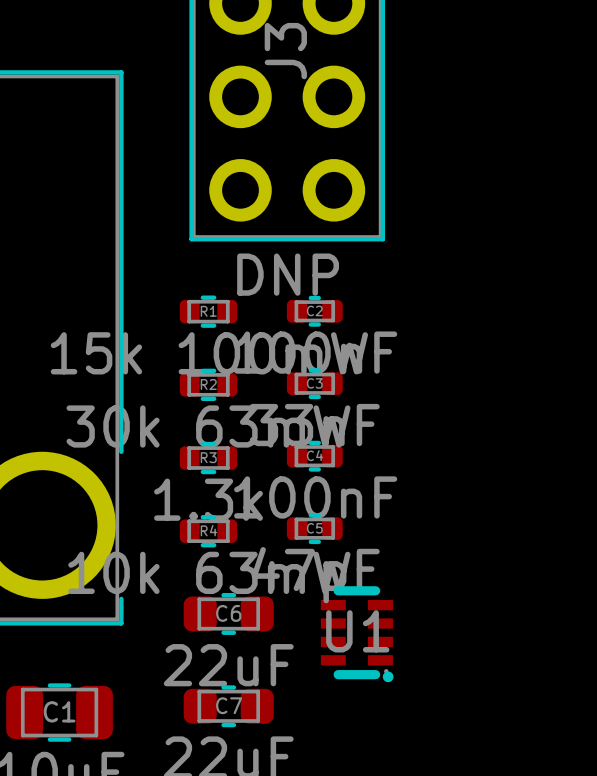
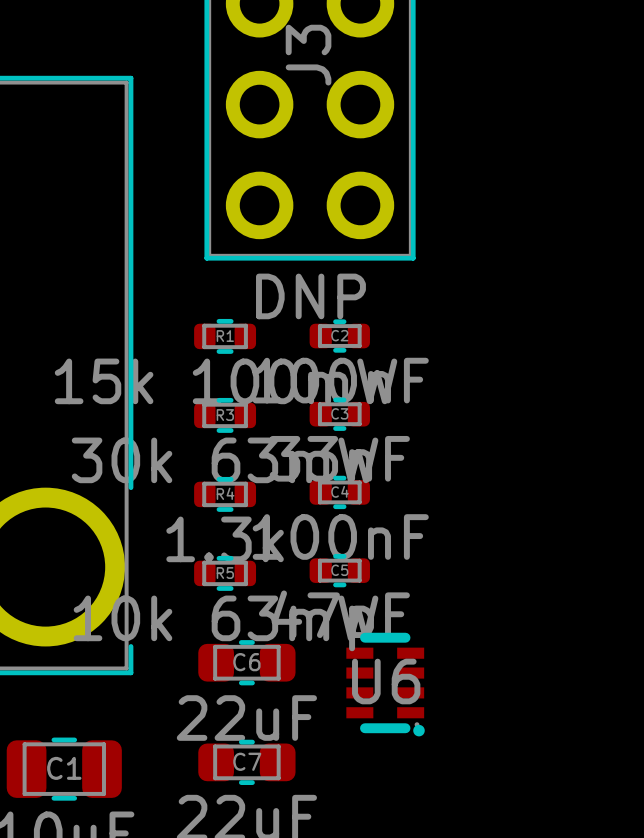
R2 name: R2 (208, 384) -> R3 (225, 415)
R3 name: R3 (208, 457) -> R4 (225, 493)
R4 name: R4 (208, 530) -> R5 (225, 573)
U1 name: U1 (357, 631) -> U6 (386, 681)

